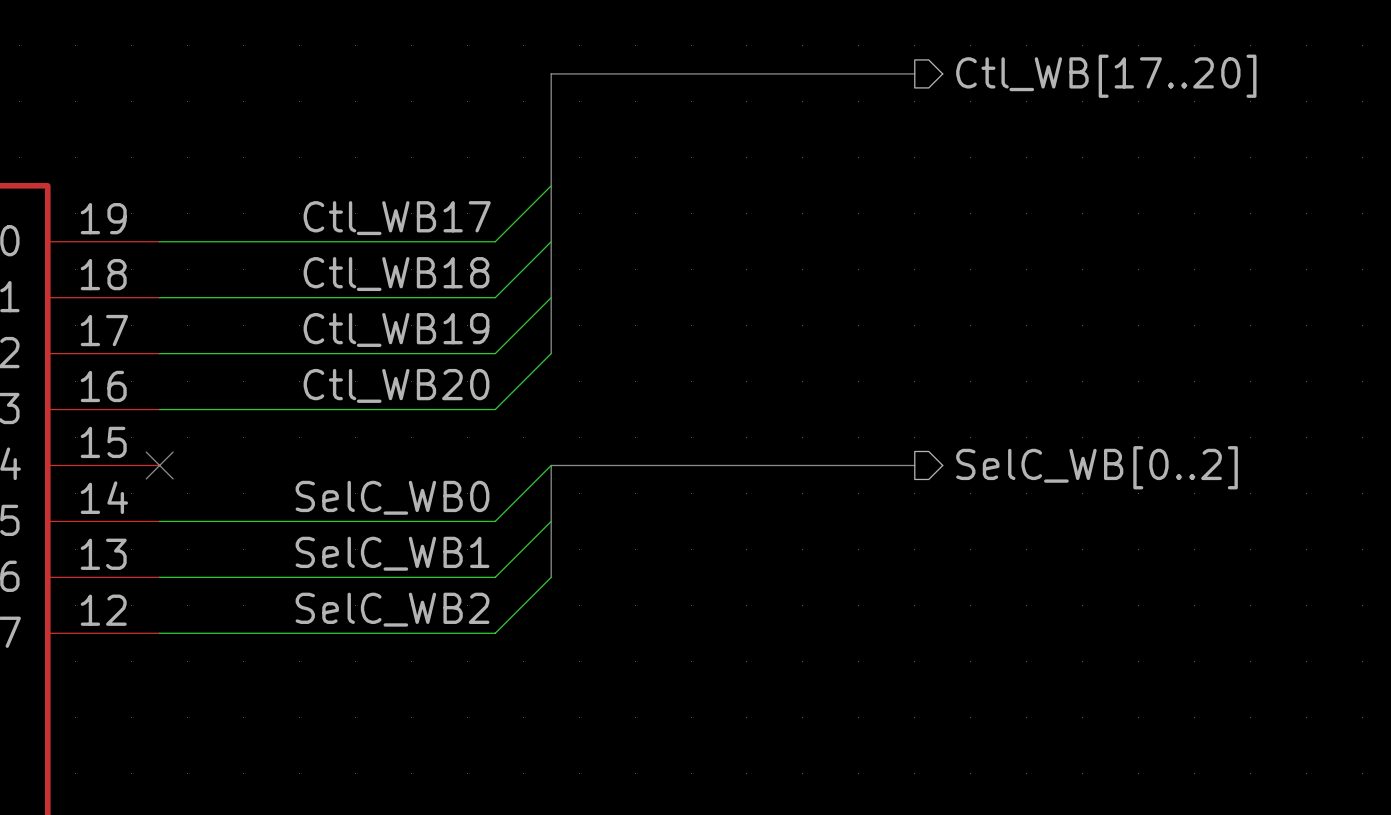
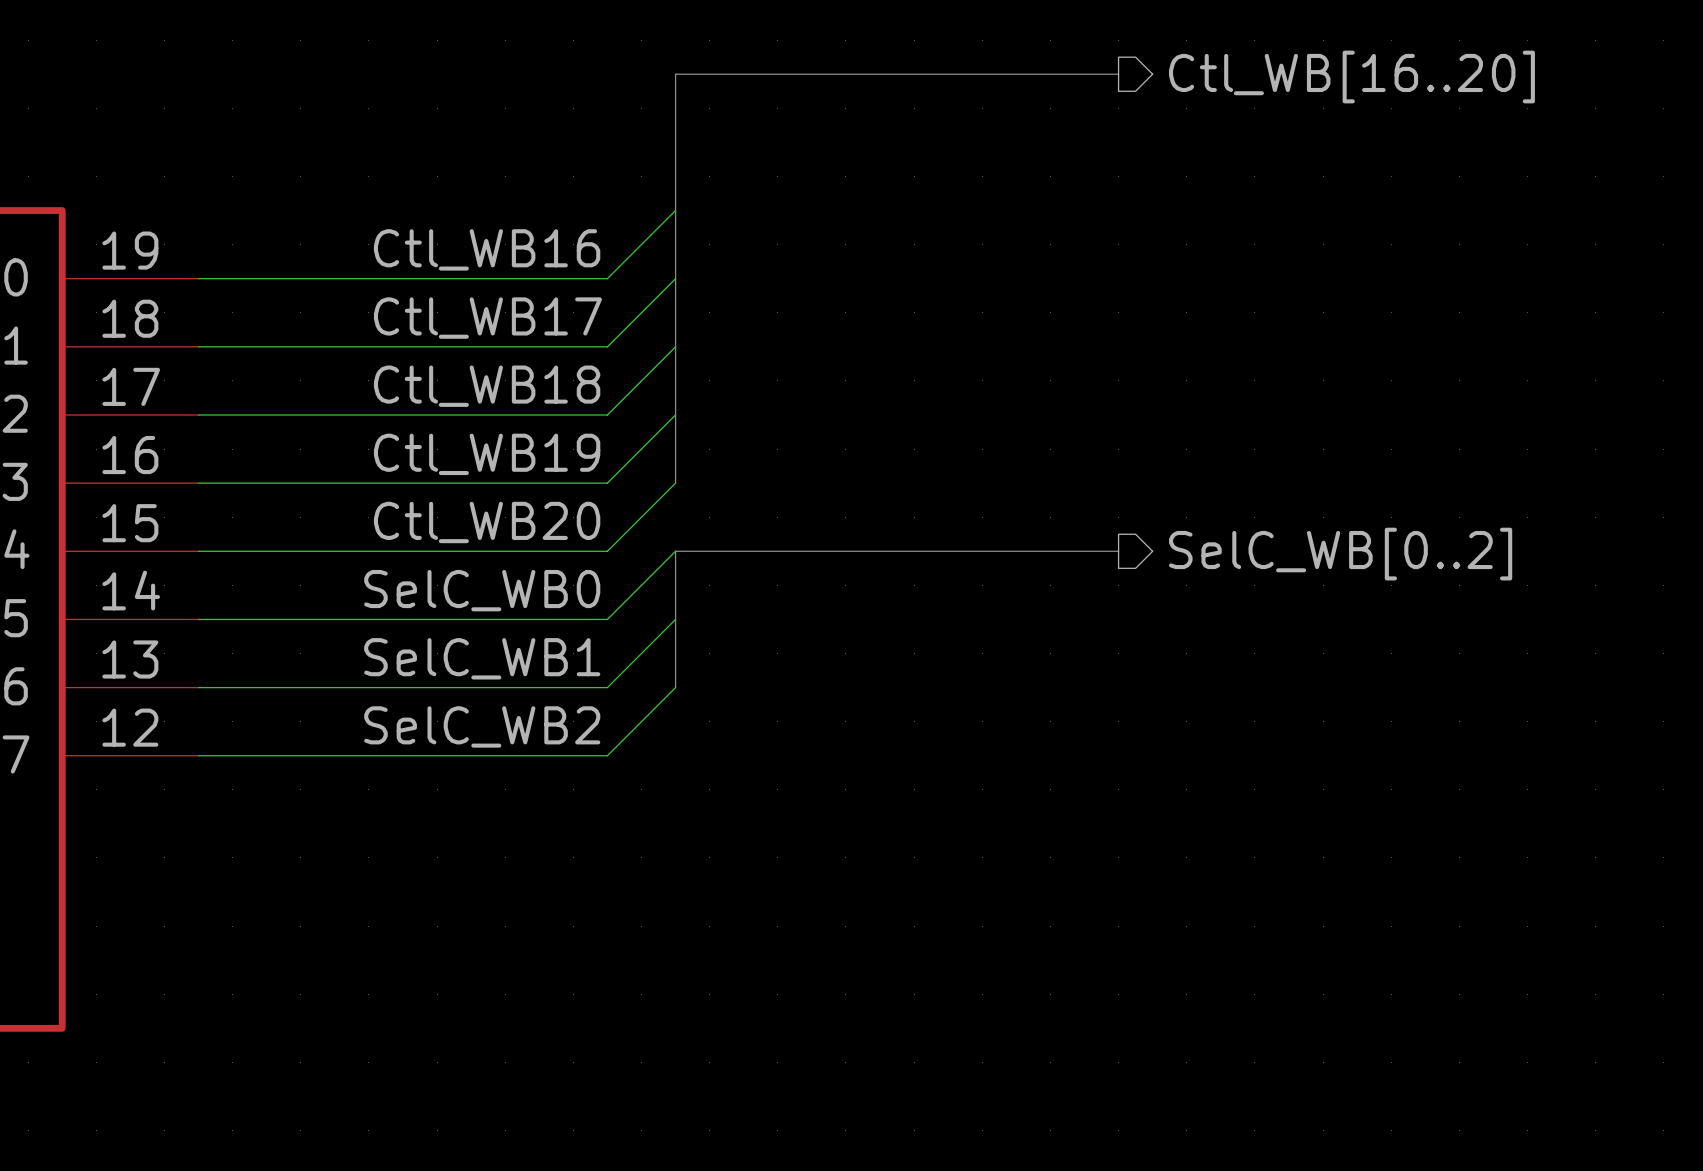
hierarchical label: Ctl_WB[17..20] (1106, 76) -> Ctl_WB[16..20] (1351, 77)
label: Ctl_WB17 (397, 218) -> Ctl_WB16 (487, 249)
label: Ctl_WB18 (396, 274) -> Ctl_WB17 (487, 318)
label: Ctl_WB19 (396, 329) -> Ctl_WB18 (487, 386)
bus: none -> (675, 414) (675, 483)
label: Ctl_WB20 (396, 385) -> Ctl_WB19 (487, 454)
wire: none -> (675, 483) (607, 551) (198, 551)
label: none -> Ctl_WB20 (487, 522)
no-connect mark: (159, 465) -> none

